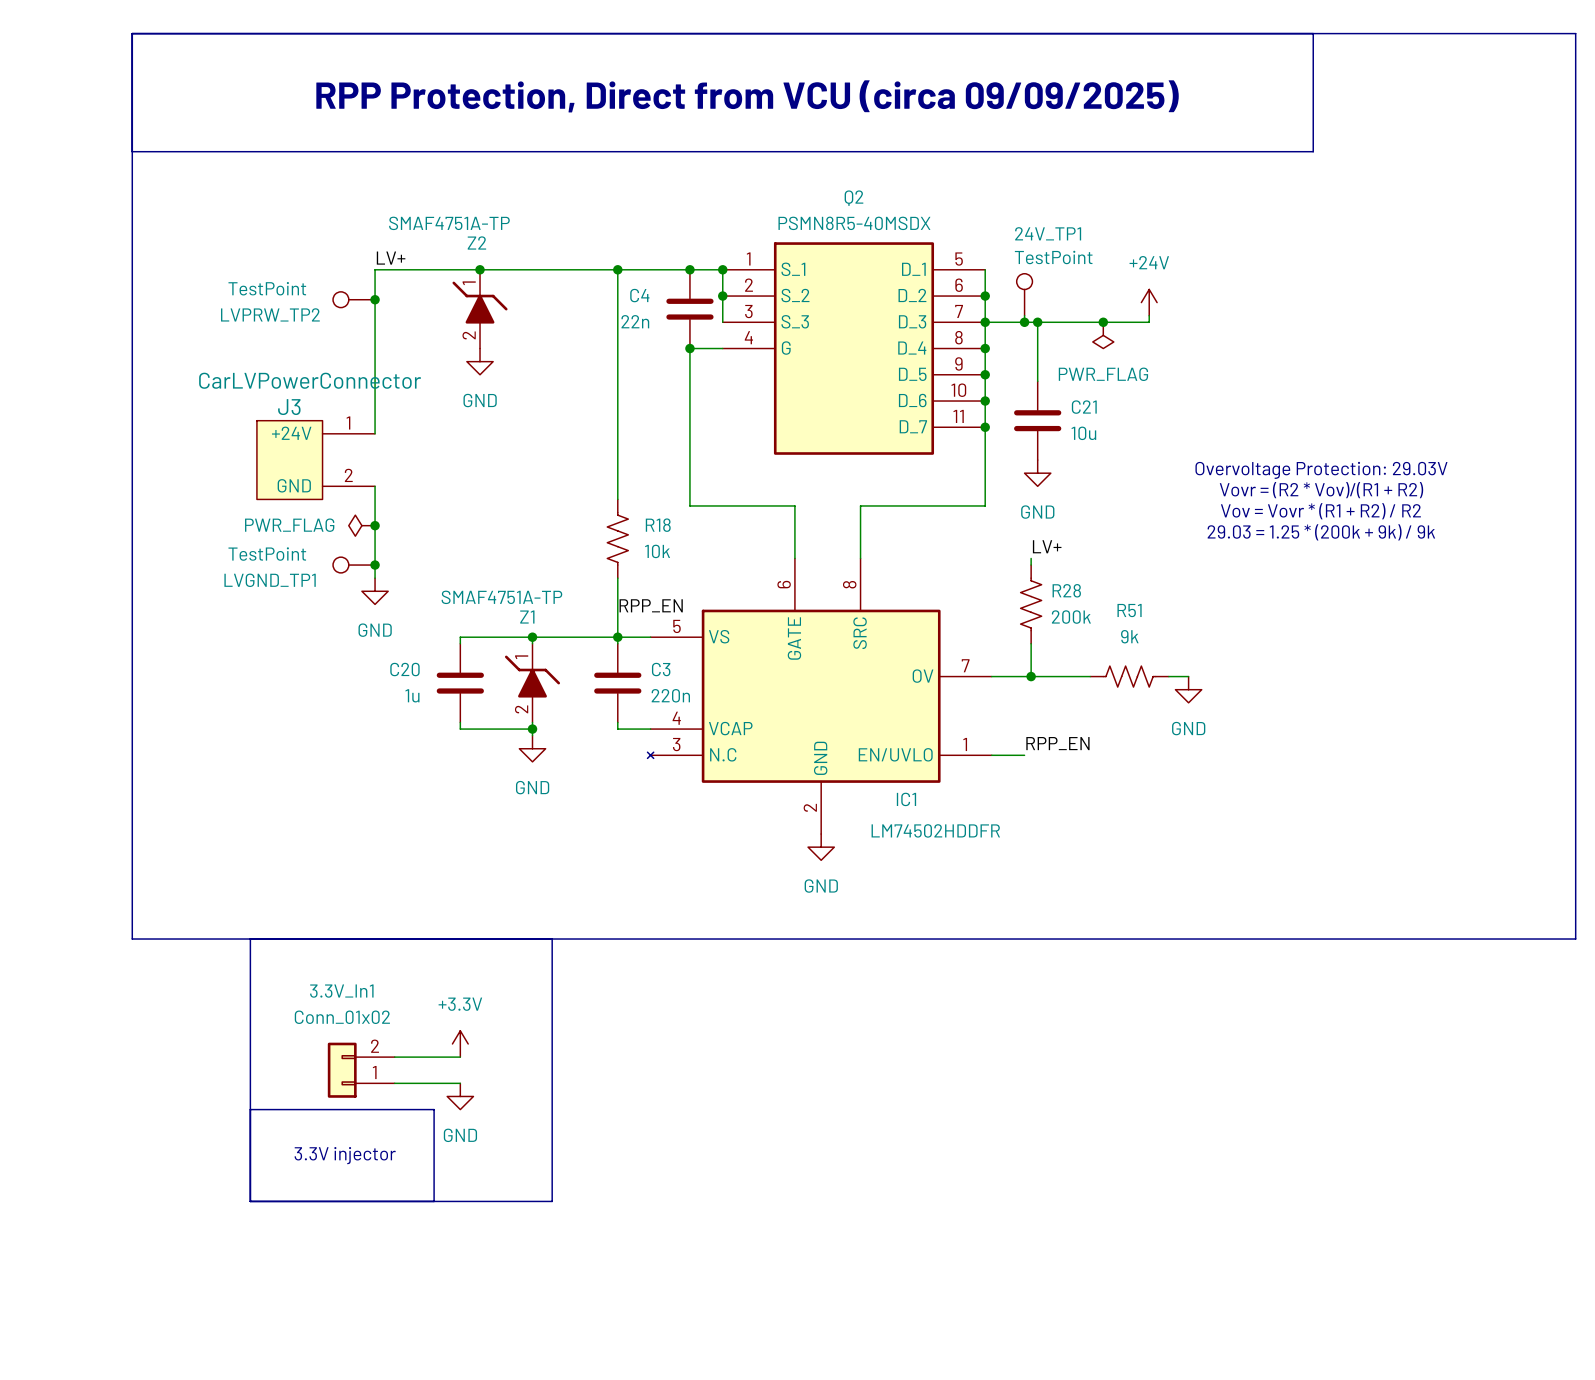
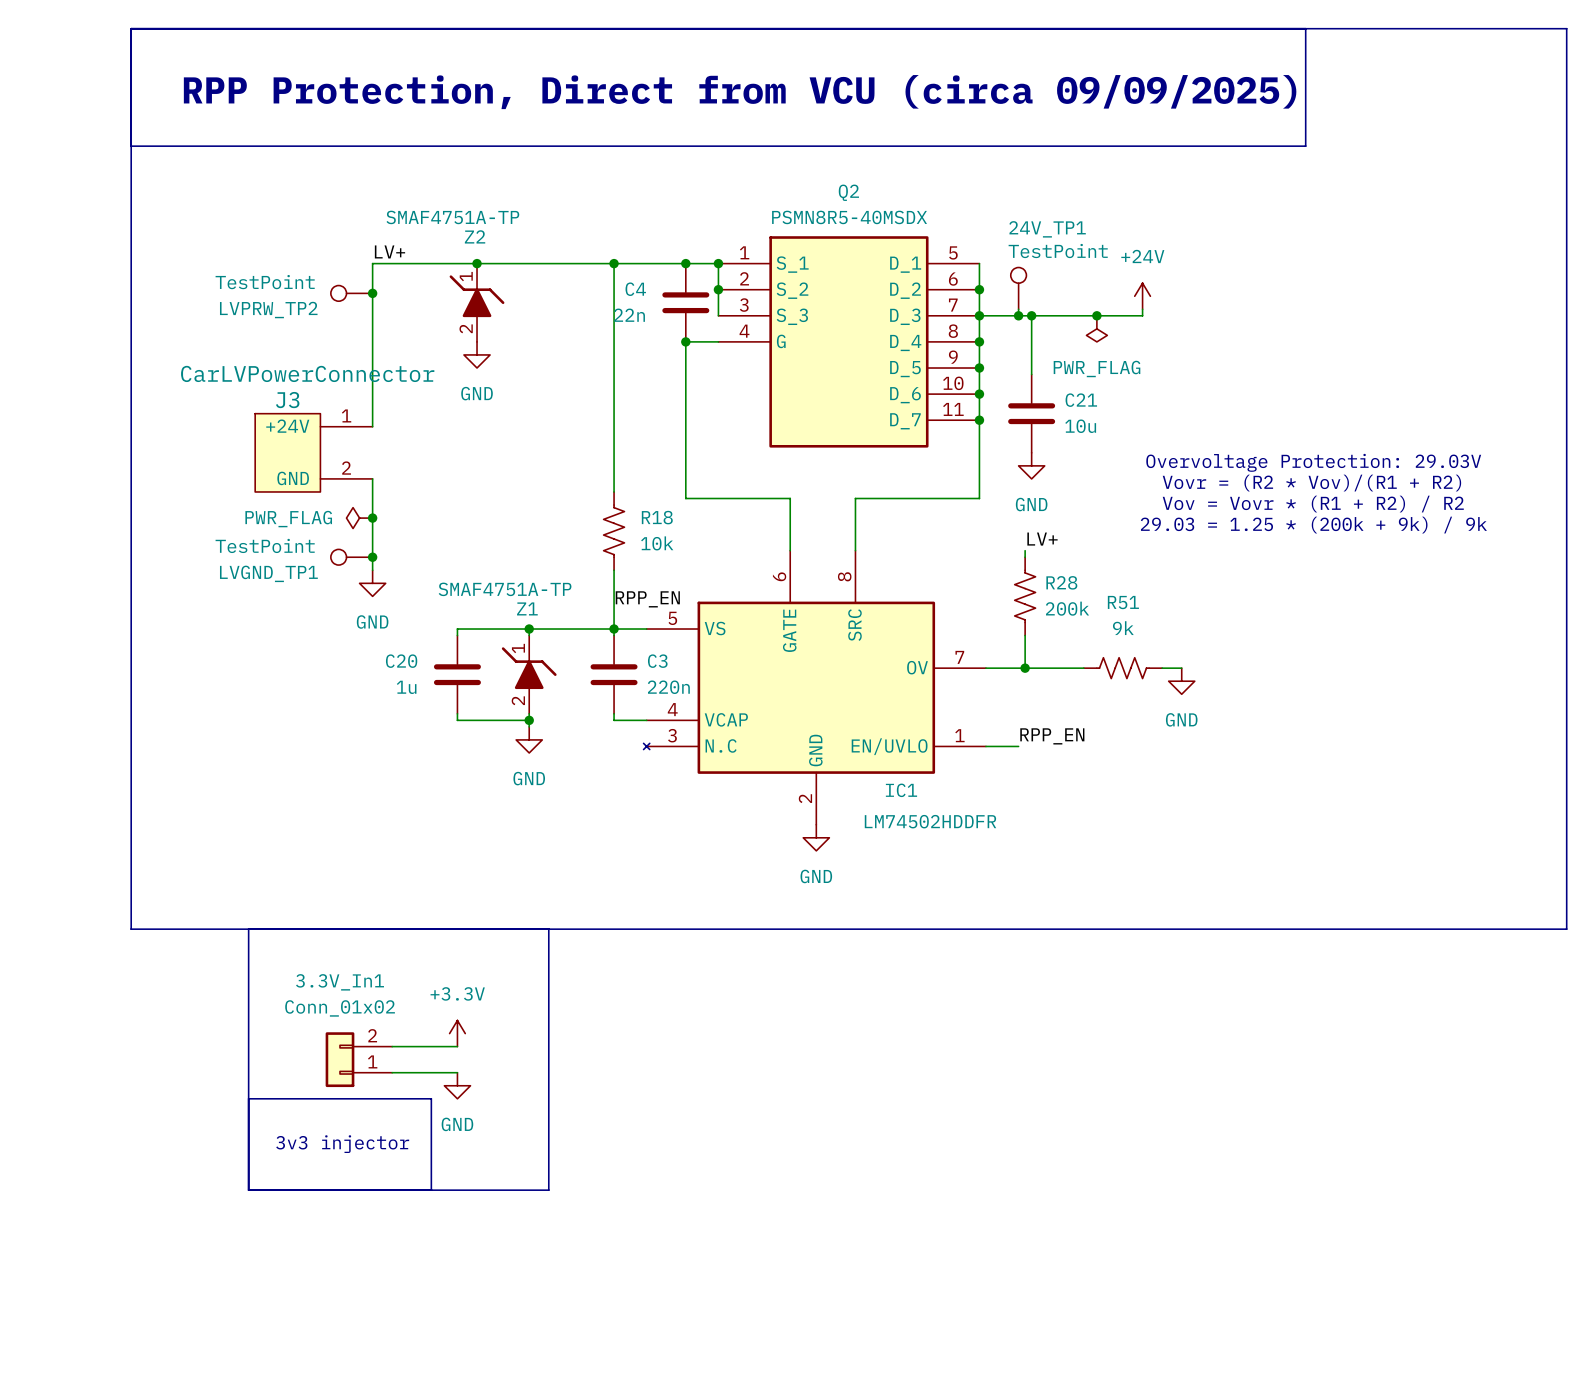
text: 3.3V injector (345, 1155) -> 3v3 injector (342, 1144)

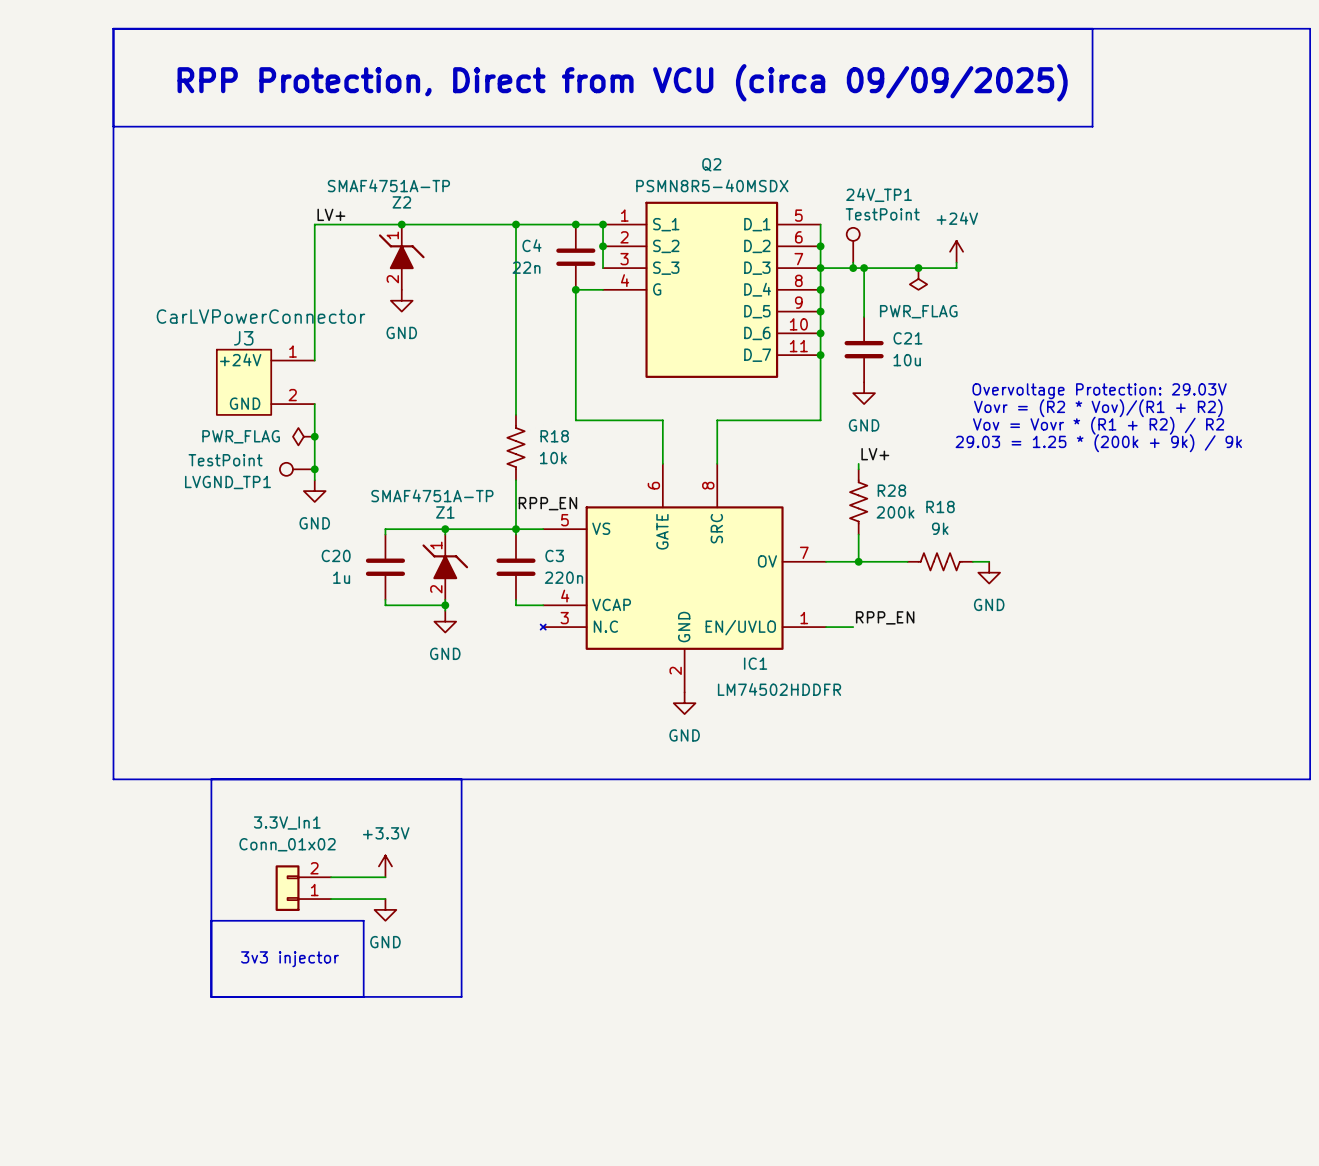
LVPRW_TP2: TestPoint (351, 293) -> none
junction: (372, 293) -> none
R51 name: R51 (1123, 602) -> R18 (940, 506)

